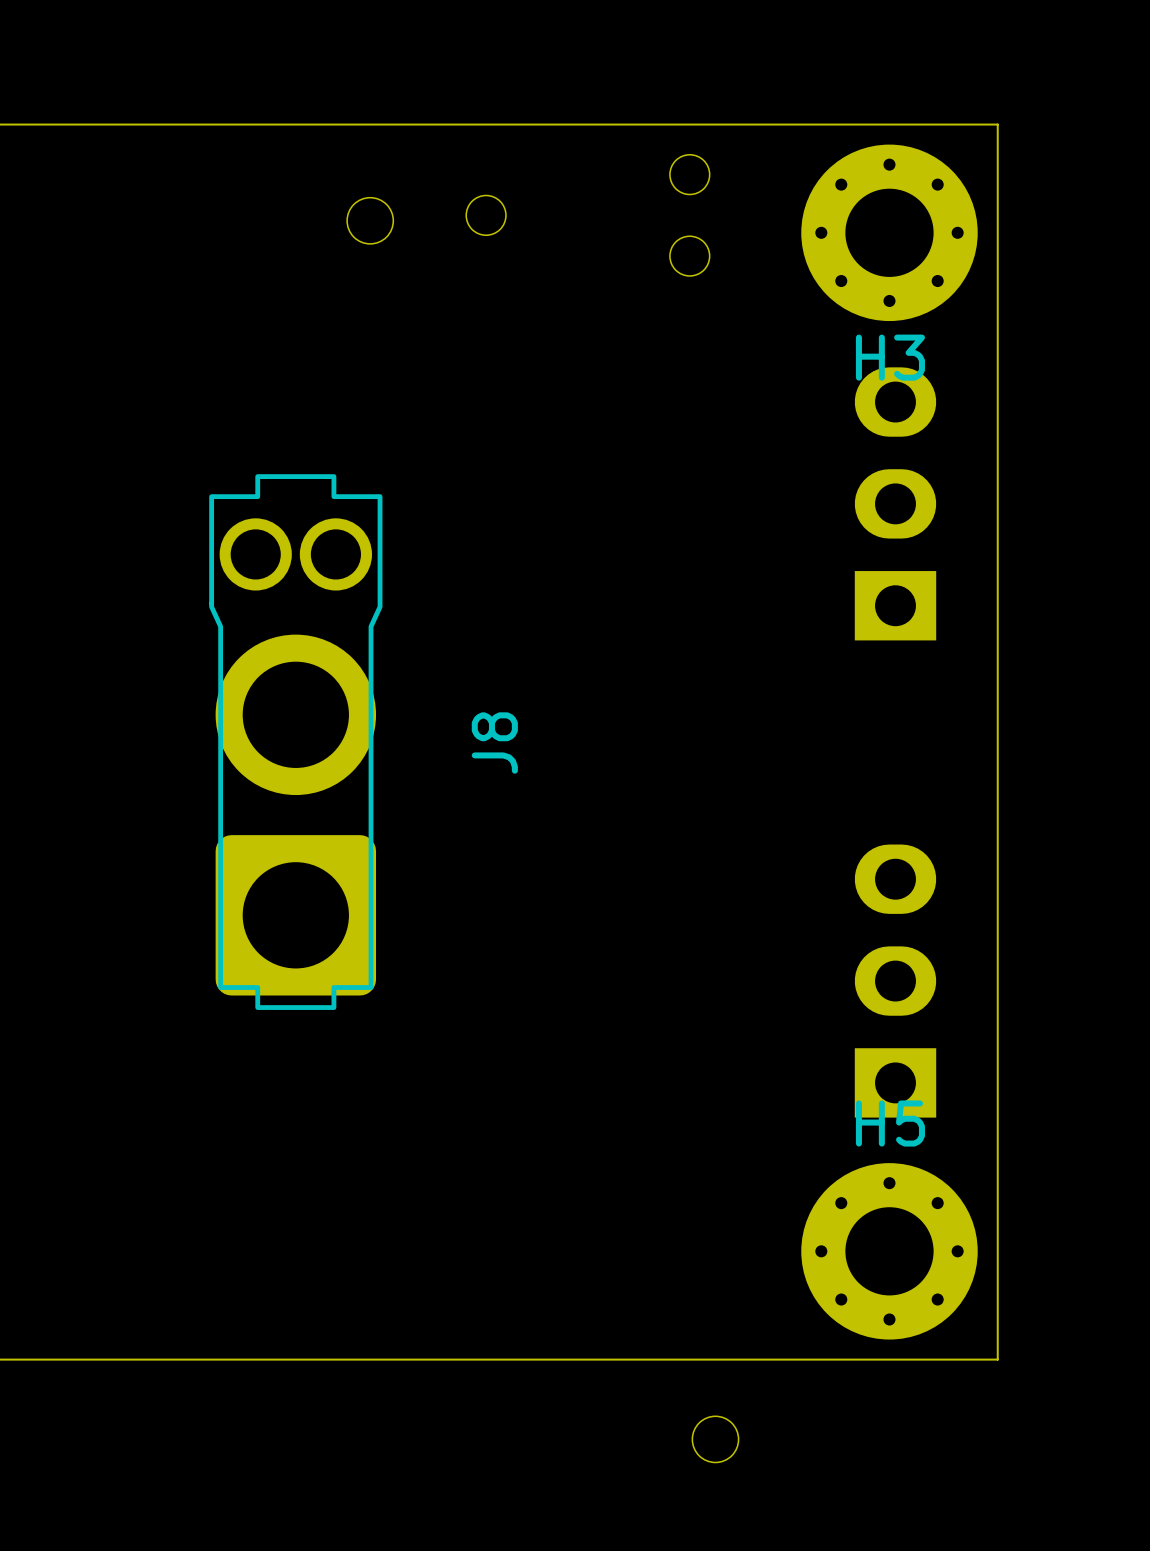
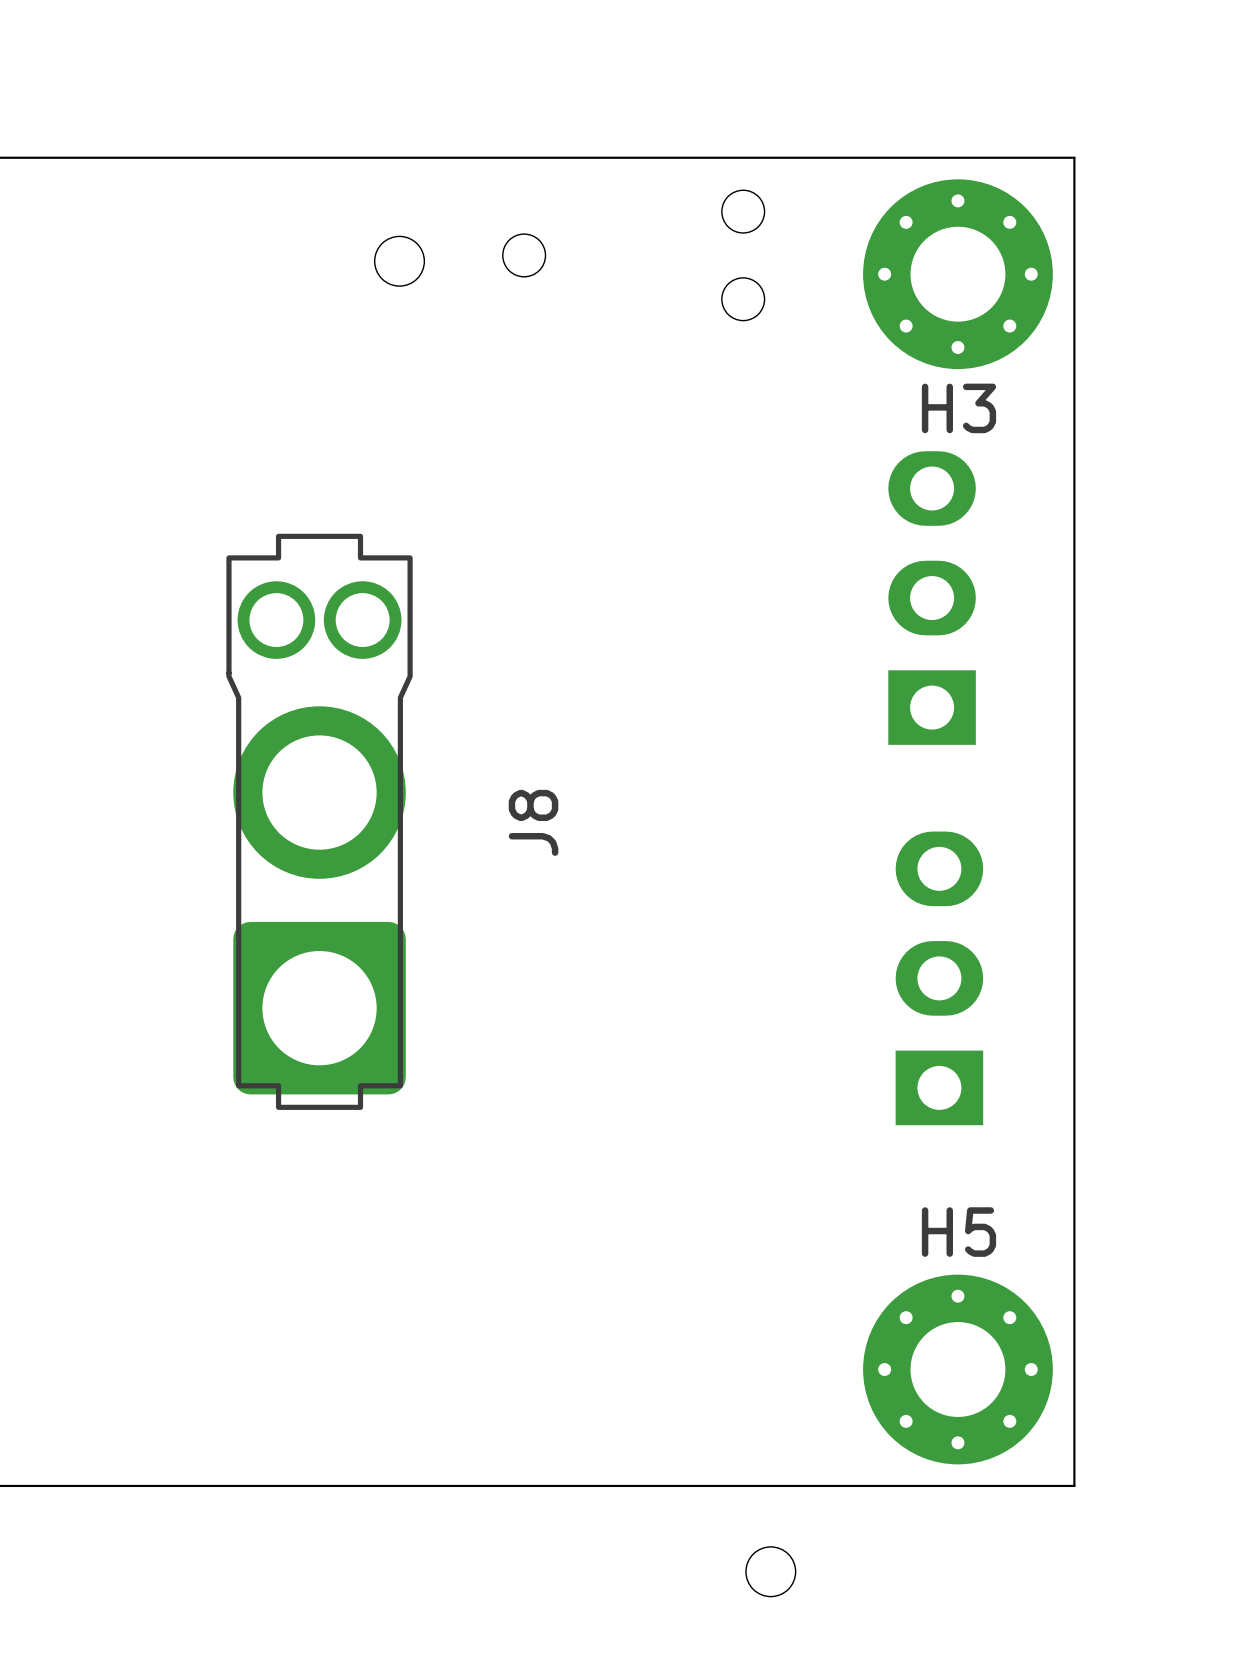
part position: (895, 503) -> (932, 598)
part position: (895, 981) -> (939, 978)

